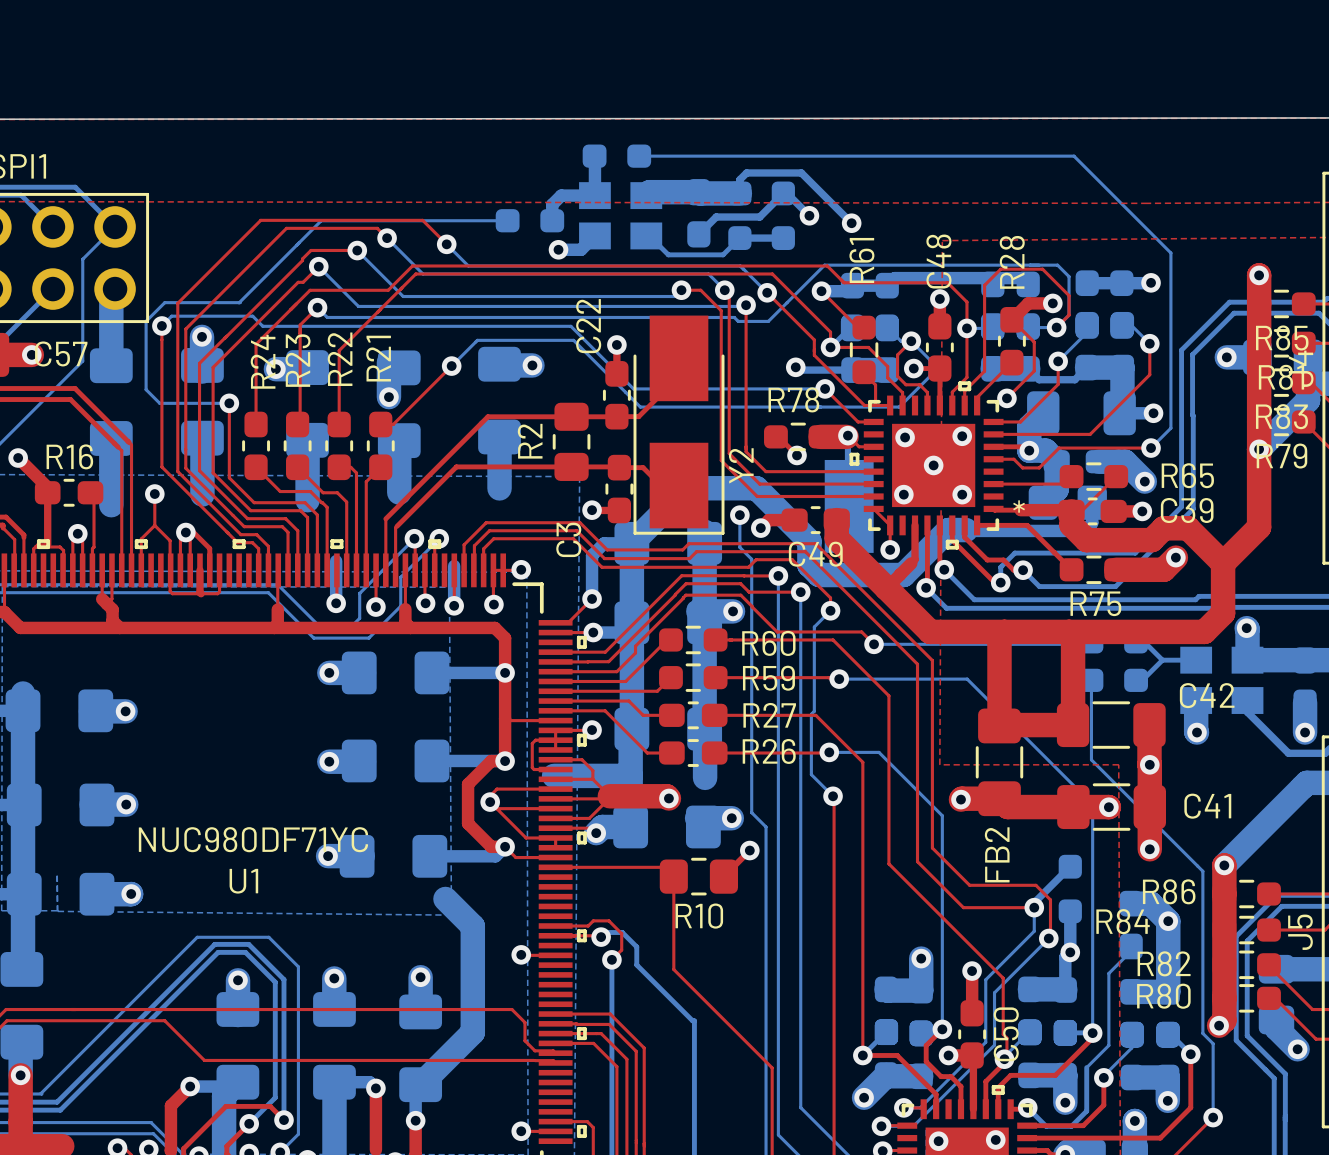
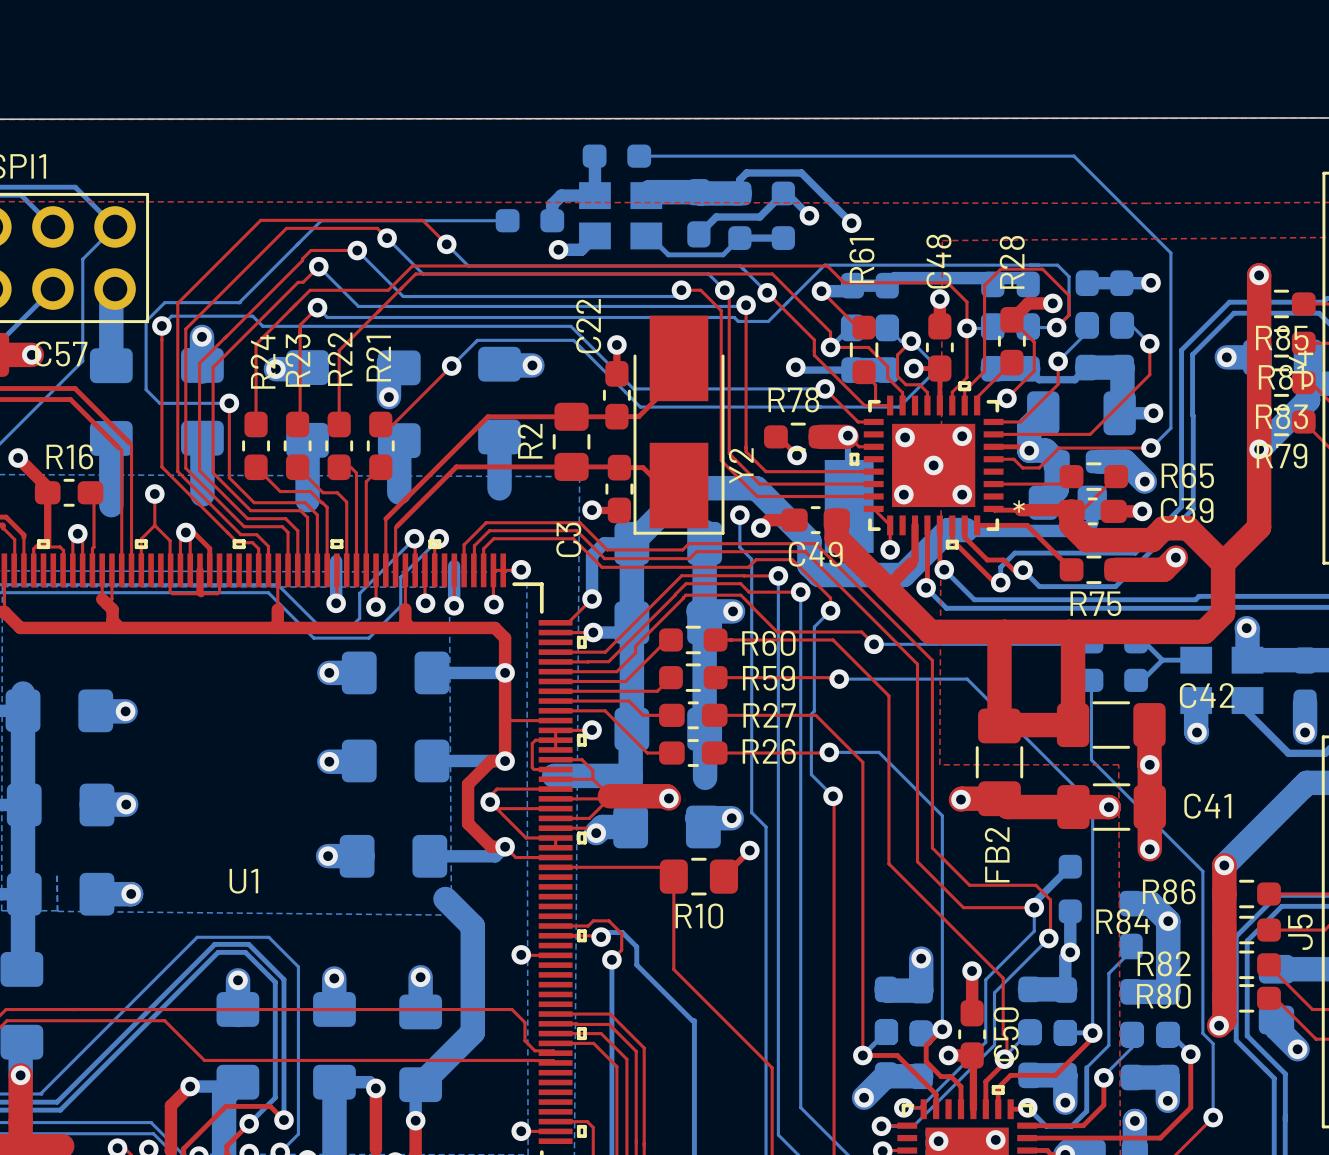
U1 value: NUC980DF71YC (253, 839) -> none

